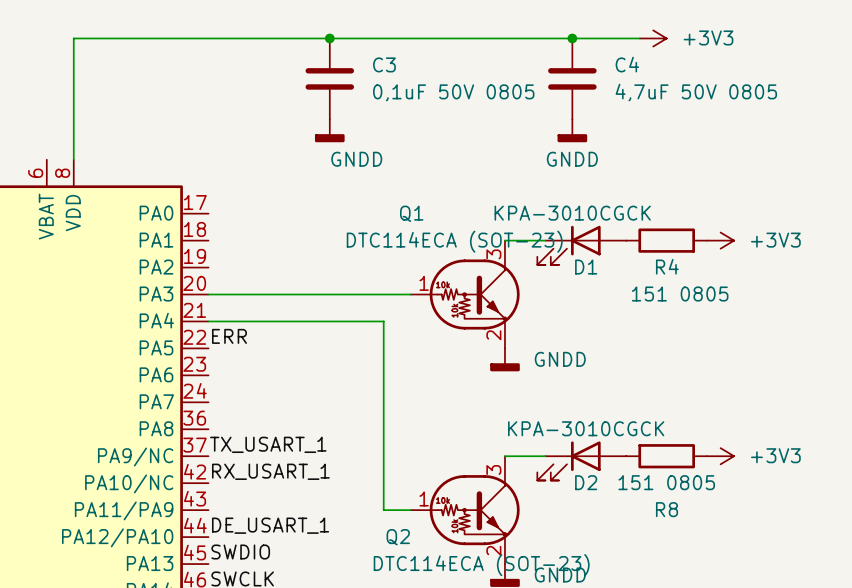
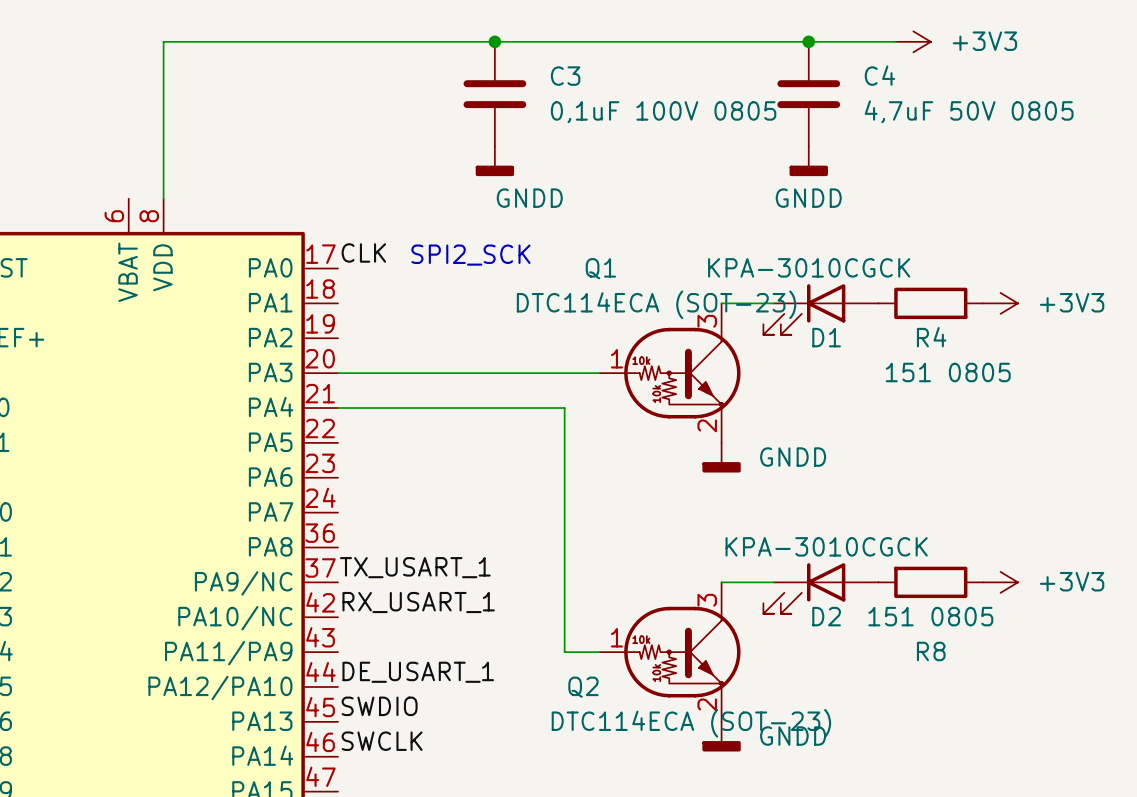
C3 value: 0,1uF 50V 0805 (453, 92) -> 0,1uF 100V 0805 (663, 112)
label: none -> CLK (363, 252)
text: none -> SPI2_SCK (470, 255)
label: ERR (229, 336) -> none

